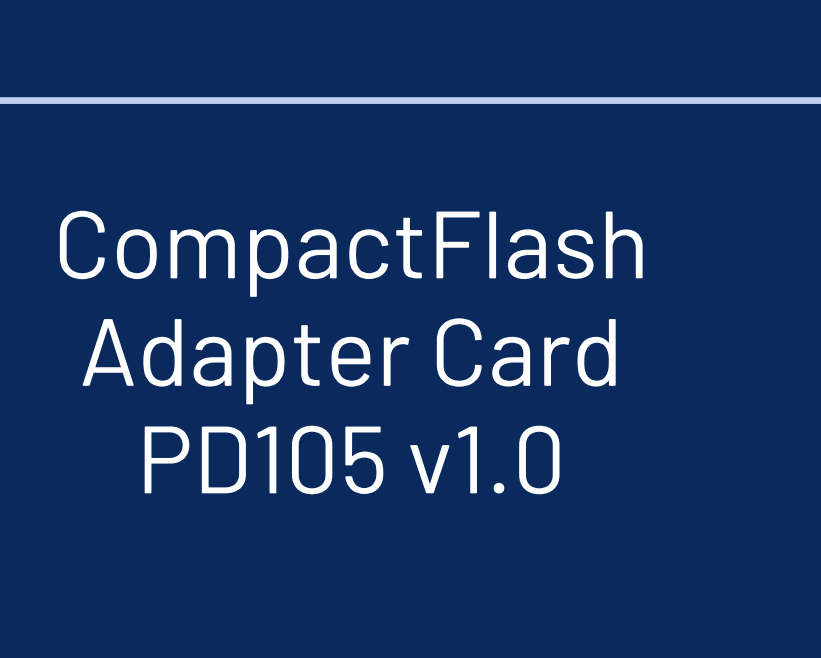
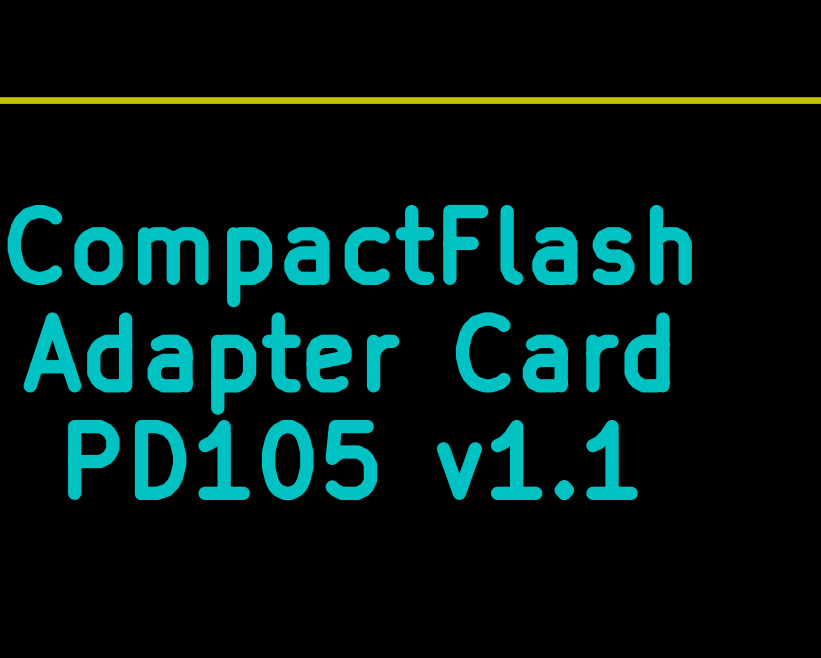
text: PD105 v1.0 (352, 459) -> PD105 v1.1 (352, 459)

